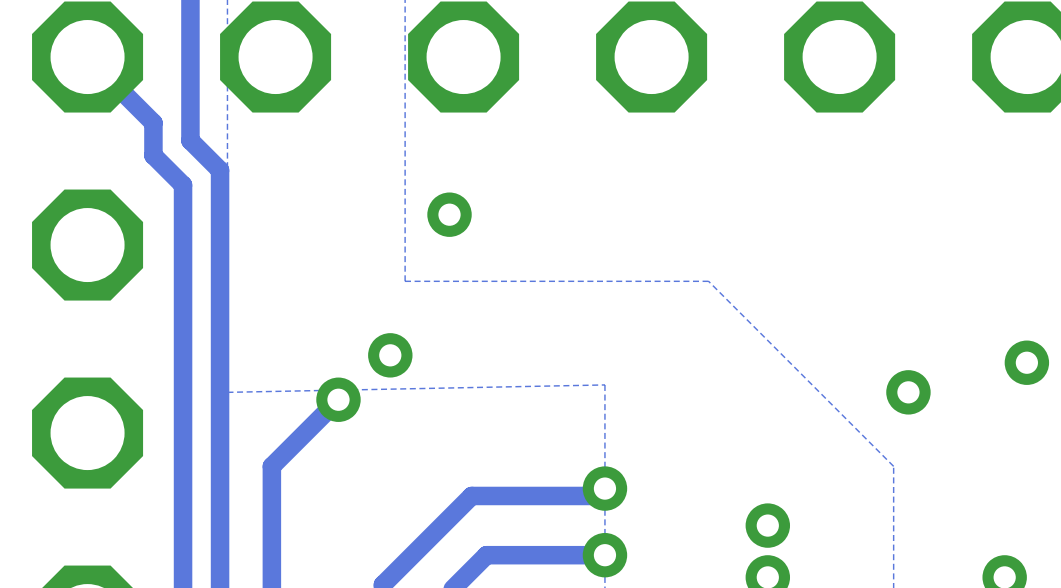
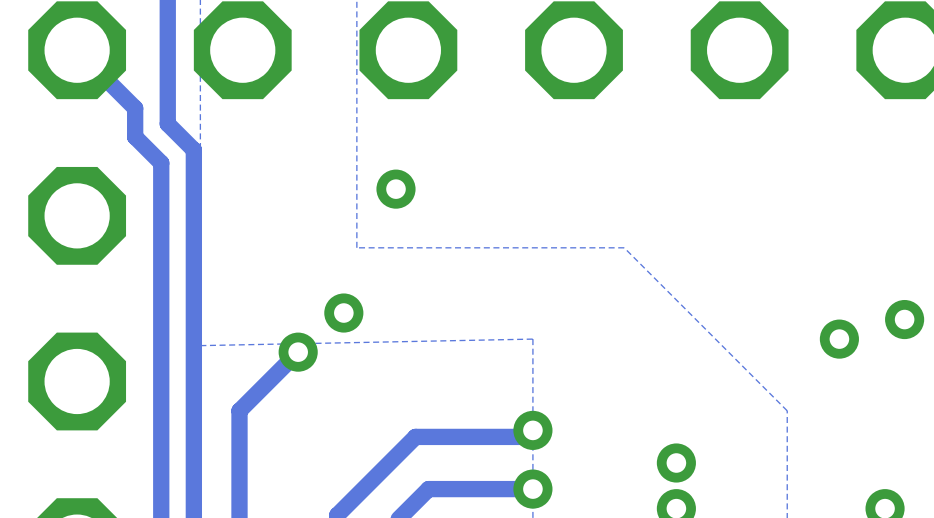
via position: (908, 392) -> (839, 339)

